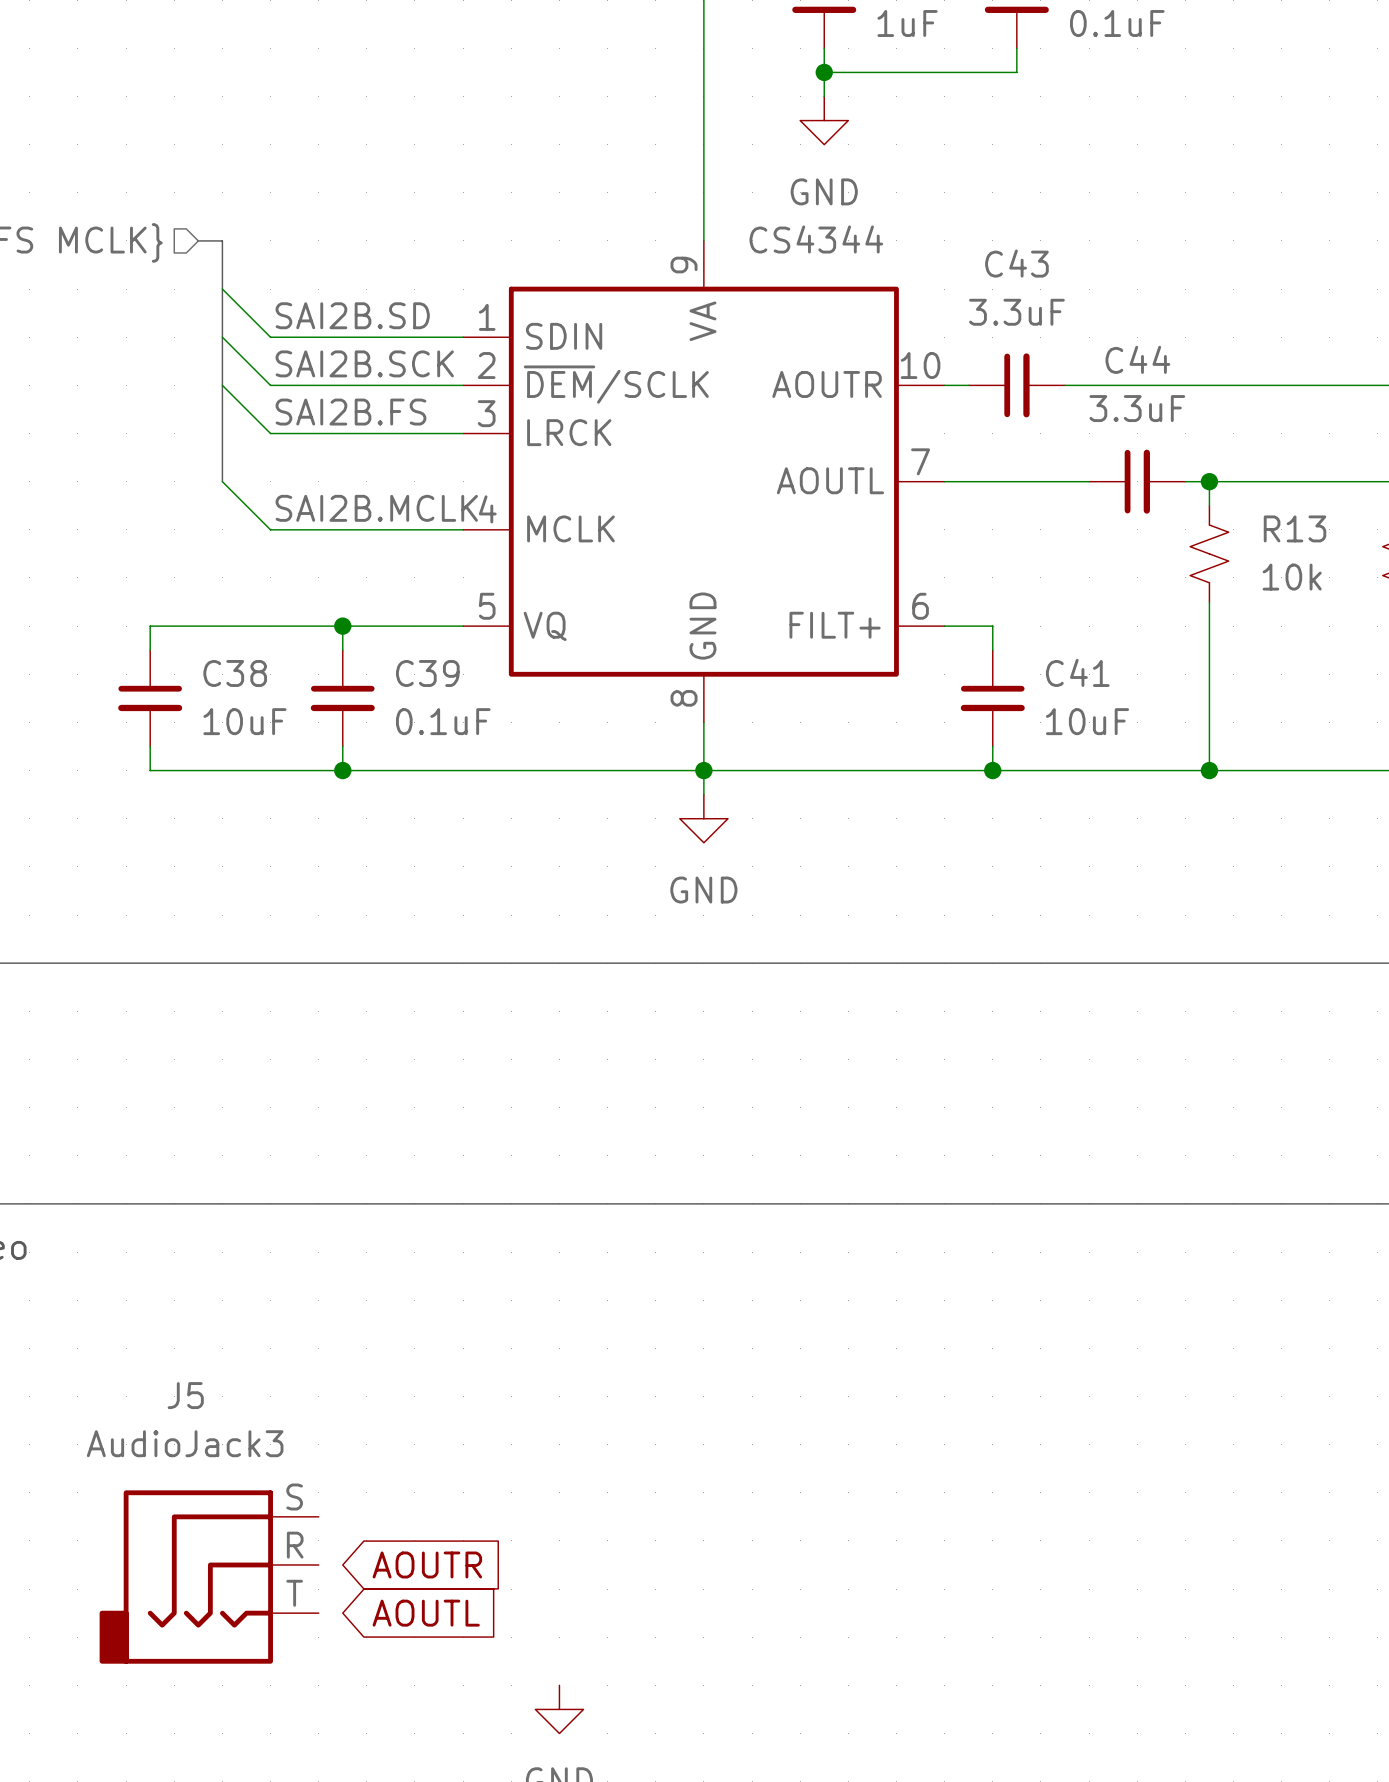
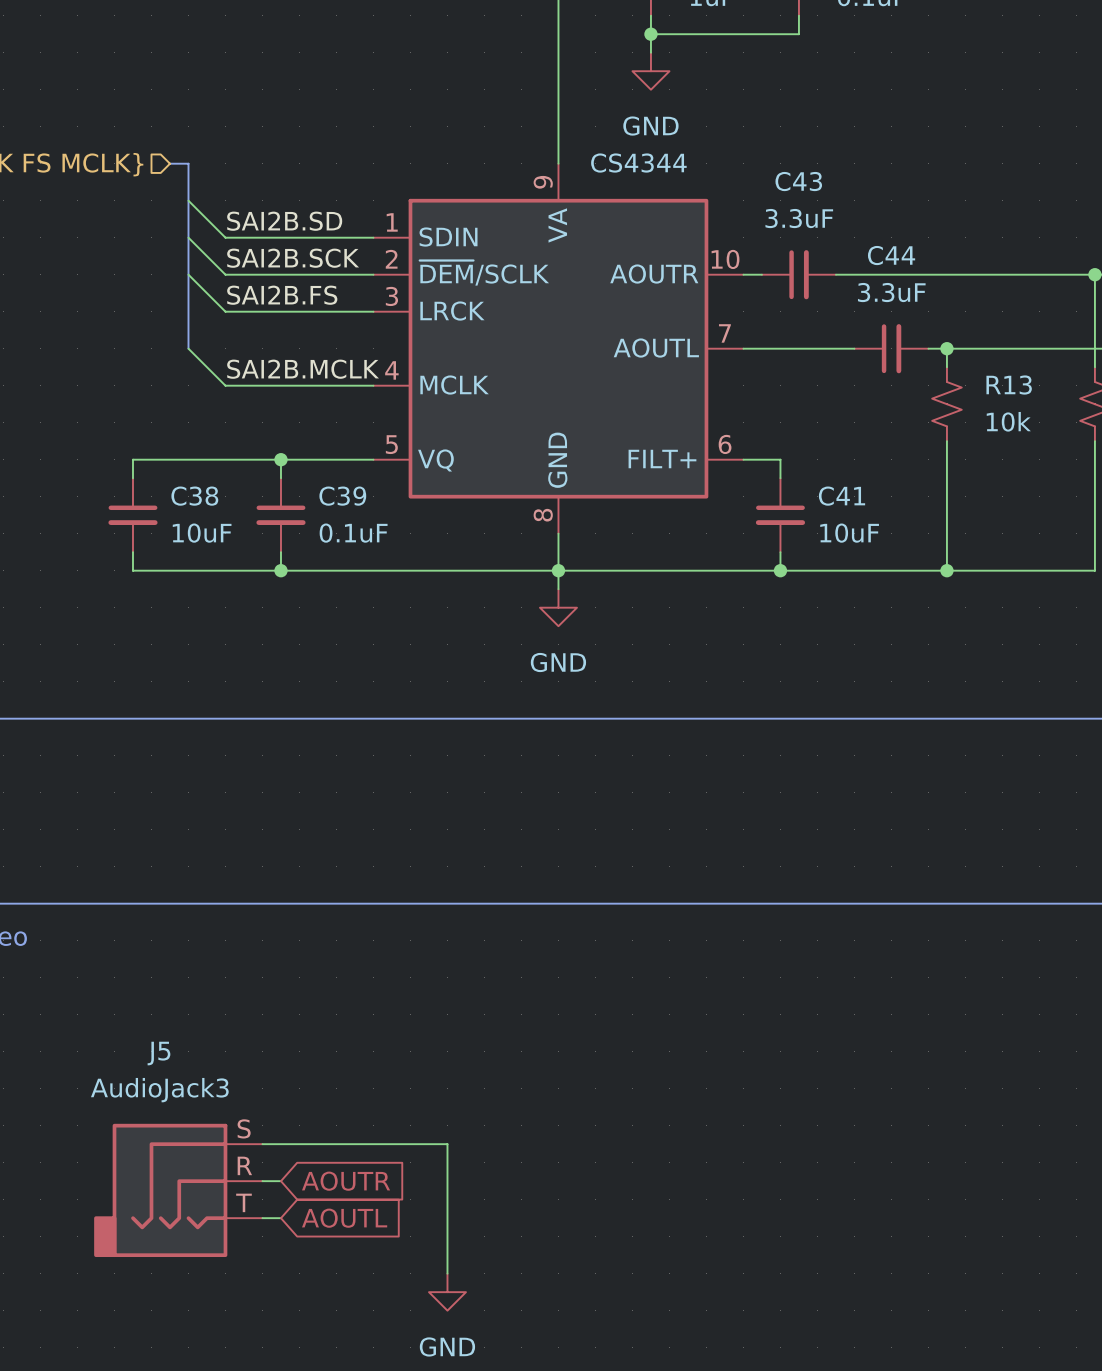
wire: none -> (262, 1144) (447, 1144) (447, 1273)
wire: none -> (262, 1181) (280, 1181)
wire: none -> (262, 1218) (280, 1218)

